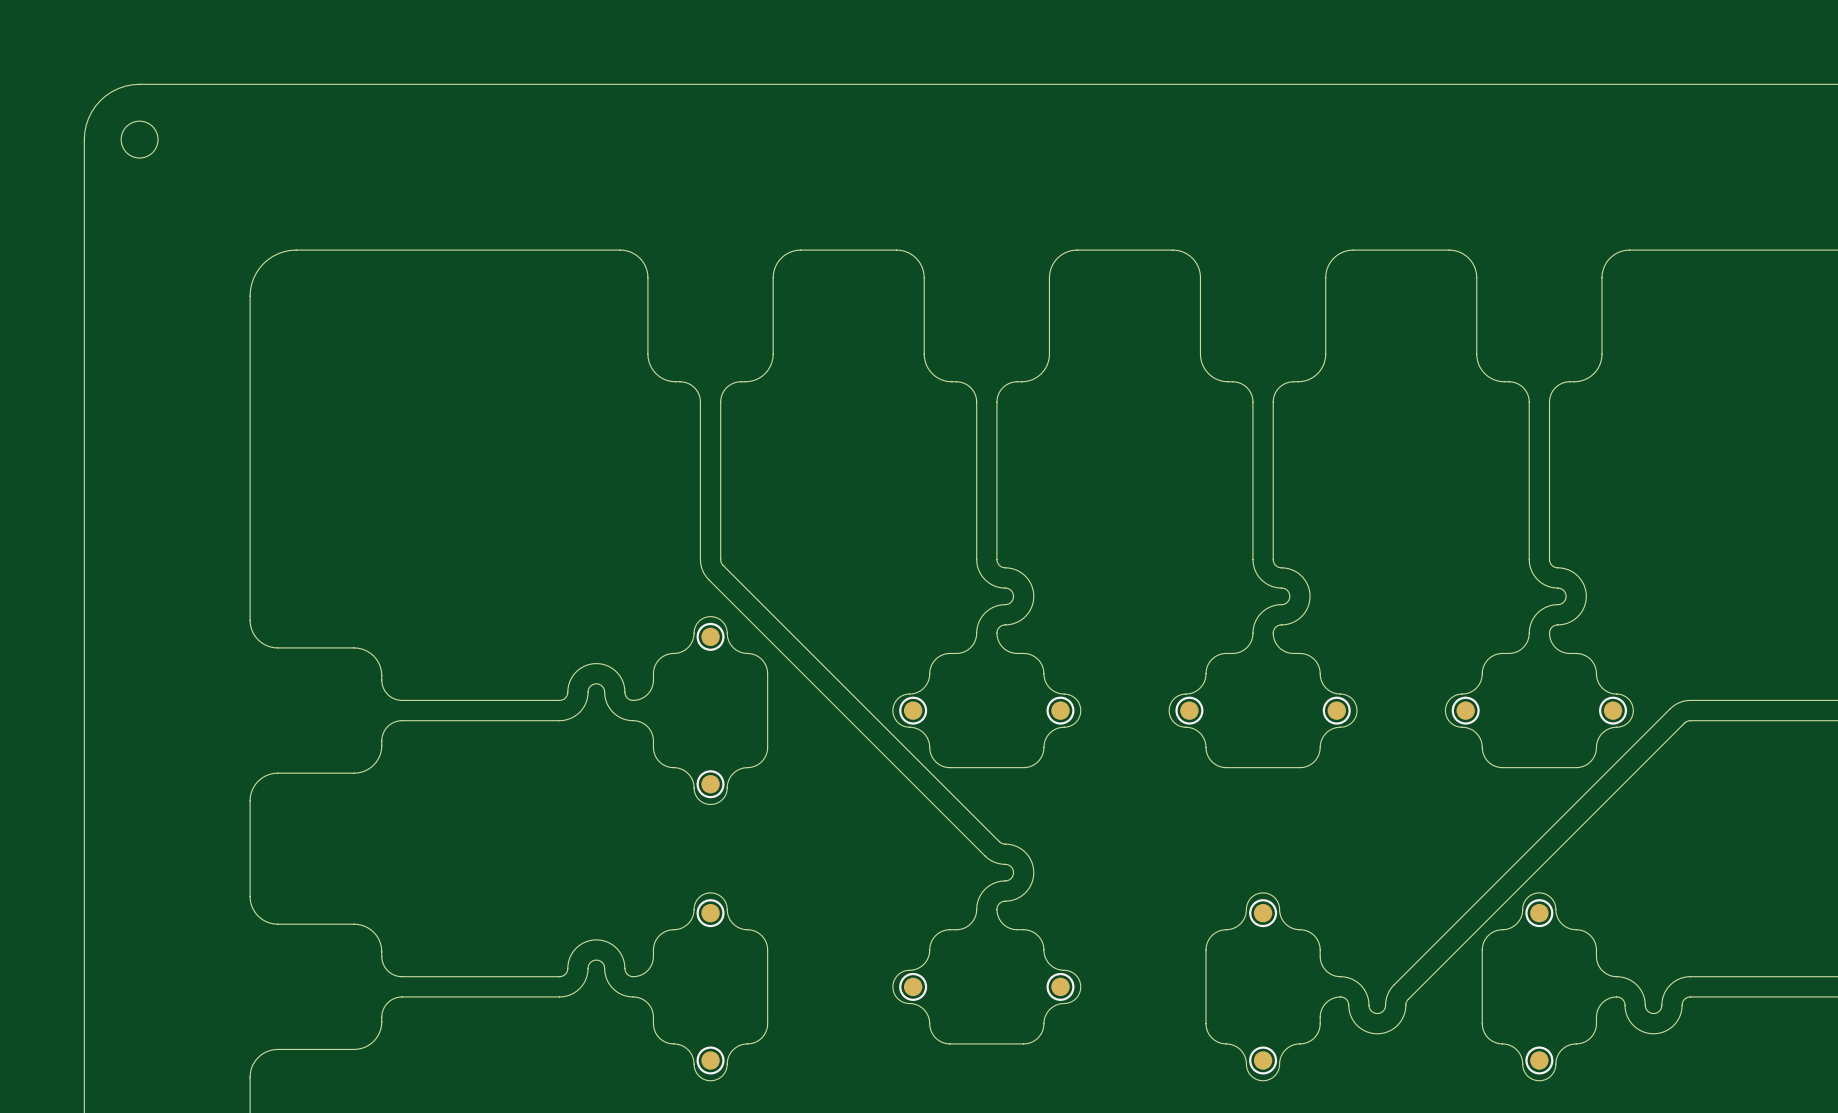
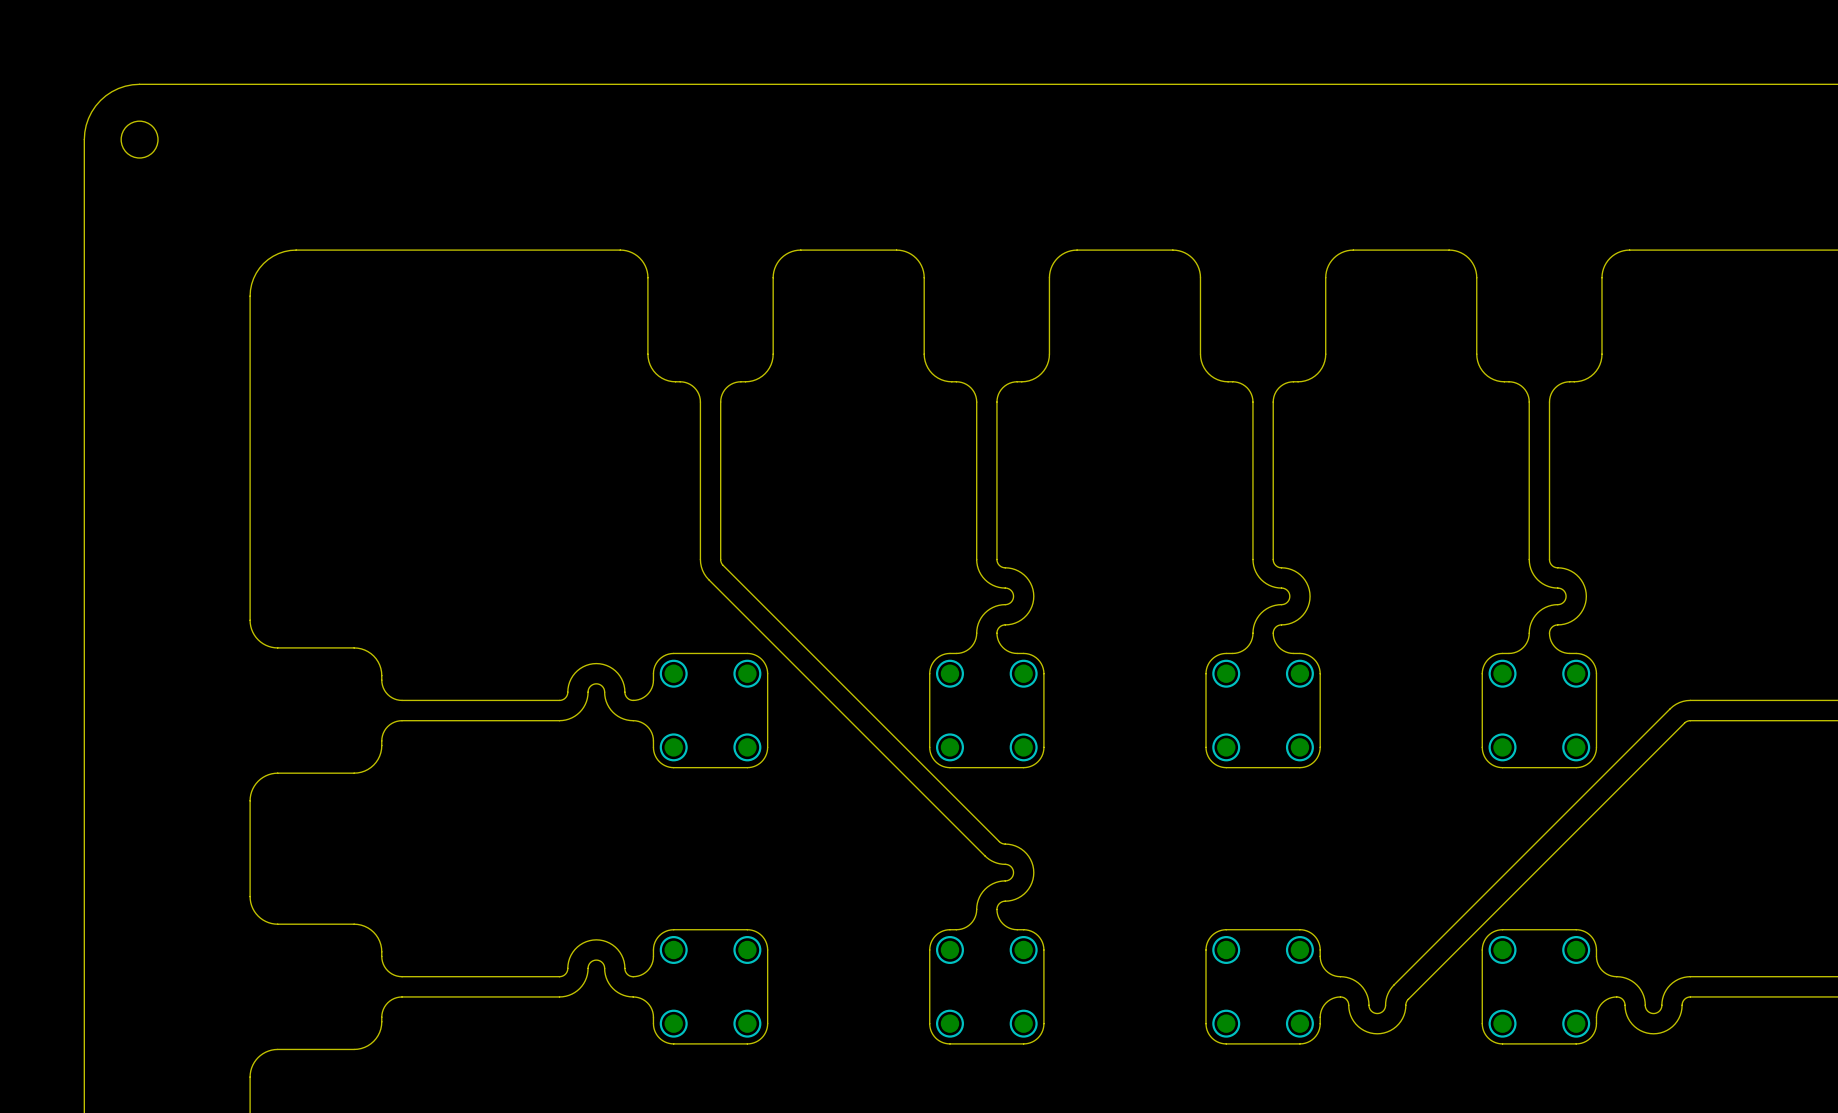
part: (710, 636) -> none
board edge: (673, 653) (682, 651) (689, 645) (695, 627) (699, 620) (706, 617) (714, 617) (724, 623) (728, 640) (733, 647) (739, 651) (759, 657) (764, 663) (767, 673) -> (673, 653) (751, 653) (763, 661) (767, 673)
part: none -> (673, 673)
part: none -> (747, 673)
board edge: (929, 673) (928, 680) (923, 688) (916, 692) (900, 697) (894, 702) (892, 710) (894, 718) (900, 724) (917, 728) (923, 733) (928, 739) (929, 747) -> (929, 673) (929, 747)
part: none -> (949, 673)
part: none -> (1023, 673)
board edge: (1043, 673) (1045, 680) (1049, 688) (1057, 692) (1073, 697) (1078, 702) (1080, 710) (1078, 718) (1073, 724) (1057, 728) (1049, 733) (1045, 738) (1043, 747) -> (1043, 673) (1043, 747)
board edge: (1206, 673) (1204, 682) (1200, 688) (1192, 692) (1176, 697) (1171, 702) (1169, 710) (1171, 718) (1176, 724) (1193, 728) (1200, 733) (1204, 739) (1206, 747) -> (1206, 673) (1206, 747)
part: none -> (1226, 673)
part: none -> (1299, 673)
board edge: (1320, 673) (1322, 682) (1326, 688) (1333, 692) (1349, 697) (1355, 702) (1357, 710) (1355, 718) (1349, 724) (1333, 728) (1326, 733) (1321, 740) (1320, 747) -> (1320, 673) (1320, 747)
board edge: (1482, 673) (1481, 680) (1476, 688) (1468, 692) (1452, 697) (1447, 702) (1445, 710) (1447, 718) (1452, 724) (1469, 728) (1476, 733) (1480, 739) (1482, 747) -> (1482, 673) (1482, 747)
part: none -> (1502, 673)
part: none -> (1576, 673)
board edge: (1596, 673) (1597, 680) (1602, 688) (1610, 692) (1626, 697) (1631, 702) (1633, 710) (1631, 718) (1626, 724) (1608, 728) (1602, 733) (1598, 739) (1596, 747) -> (1596, 673) (1596, 747)
part: (913, 710) -> none
part: (1060, 710) -> none
part: (1189, 710) -> none
part: (1336, 710) -> none
part: (1465, 710) -> none
part: (1613, 710) -> none
part: none -> (673, 747)
part: none -> (747, 747)
part: none -> (949, 747)
part: none -> (1023, 747)
part: none -> (1226, 747)
part: none -> (1299, 747)
part: none -> (1502, 747)
part: none -> (1576, 747)
board edge: (747, 767) (739, 769) (733, 773) (728, 780) (723, 798) (716, 803) (710, 804) (702, 802) (697, 798) (692, 781) (688, 773) (682, 769) (673, 767) -> (747, 767) (673, 767)
part: (710, 784) -> none
part: (710, 913) -> none
part: (1263, 913) -> none
part: (1539, 913) -> none
board edge: (673, 929) (682, 927) (689, 922) (695, 903) (699, 897) (706, 893) (714, 893) (724, 900) (728, 917) (733, 923) (739, 928) (759, 933) (766, 942) (767, 949) -> (673, 929) (751, 930) (763, 937) (767, 949)
board edge: (1299, 929) (1293, 928) (1285, 923) (1280, 916) (1276, 899) (1269, 894) (1263, 892) (1256, 894) (1249, 899) (1244, 917) (1240, 923) (1233, 928) (1226, 929) -> (1299, 929) (1226, 929)
board edge: (1576, 929) (1569, 928) (1561, 923) (1557, 916) (1552, 899) (1547, 895) (1539, 892) (1530, 895) (1526, 899) (1521, 917) (1516, 923) (1510, 928) (1502, 929) -> (1576, 929) (1502, 929)
part: none -> (673, 949)
part: none -> (747, 949)
board edge: (929, 949) (928, 956) (923, 964) (916, 969) (900, 973) (894, 979) (892, 986) (894, 994) (900, 1000) (917, 1005) (923, 1009) (928, 1015) (929, 1023) -> (929, 949) (929, 1023)
part: none -> (949, 949)
part: none -> (1023, 949)
board edge: (1043, 949) (1045, 956) (1049, 964) (1057, 969) (1073, 973) (1078, 979) (1080, 986) (1078, 994) (1073, 1000) (1057, 1004) (1049, 1009) (1045, 1017) (1043, 1023) -> (1043, 949) (1043, 1023)
part: none -> (1226, 949)
part: none -> (1299, 949)
part: none -> (1502, 949)
part: none -> (1576, 949)
part: (913, 986) -> none
part: (1060, 986) -> none
part: none -> (673, 1023)
part: none -> (747, 1023)
part: none -> (949, 1023)
part: none -> (1023, 1023)
board edge: (1206, 1023) (1207, 1031) (1213, 1039) (1233, 1045) (1240, 1049) (1244, 1056) (1249, 1073) (1259, 1080) (1266, 1080) (1274, 1076) (1278, 1070) (1284, 1051) (1291, 1045) (1299, 1043) -> (1206, 1023) (1210, 1036) (1221, 1043) (1299, 1043)
part: none -> (1226, 1023)
part: none -> (1299, 1023)
board edge: (1482, 1023) (1484, 1033) (1490, 1039) (1510, 1045) (1516, 1049) (1521, 1056) (1525, 1073) (1535, 1080) (1543, 1080) (1550, 1076) (1554, 1070) (1560, 1051) (1567, 1045) (1576, 1043) -> (1482, 1023) (1486, 1036) (1498, 1043) (1576, 1043)
part: none -> (1502, 1023)
part: none -> (1576, 1023)
board edge: (747, 1043) (739, 1045) (733, 1049) (728, 1056) (724, 1073) (718, 1078) (710, 1080) (702, 1078) (697, 1073) (692, 1057) (688, 1049) (682, 1045) (673, 1043) -> (747, 1043) (673, 1043)
part: (710, 1060) -> none
part: (1263, 1060) -> none
part: (1539, 1060) -> none

